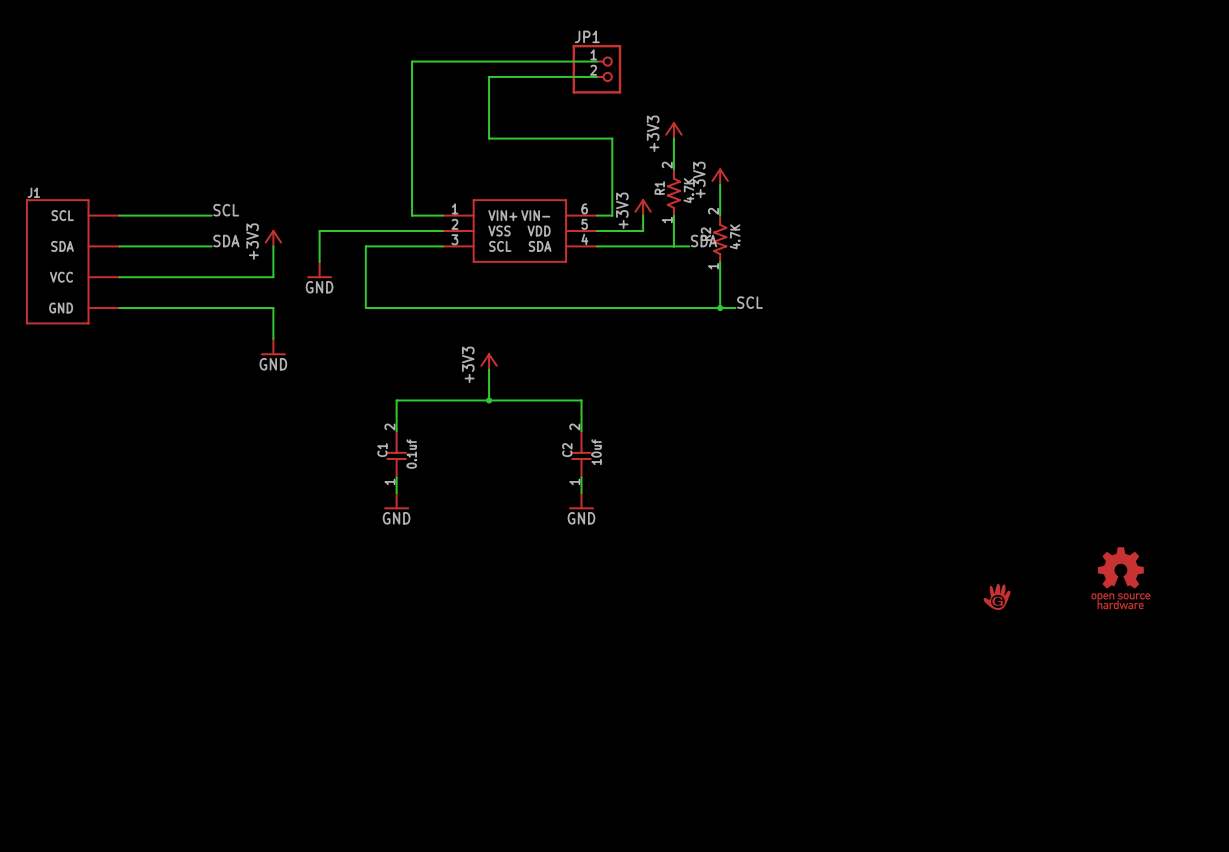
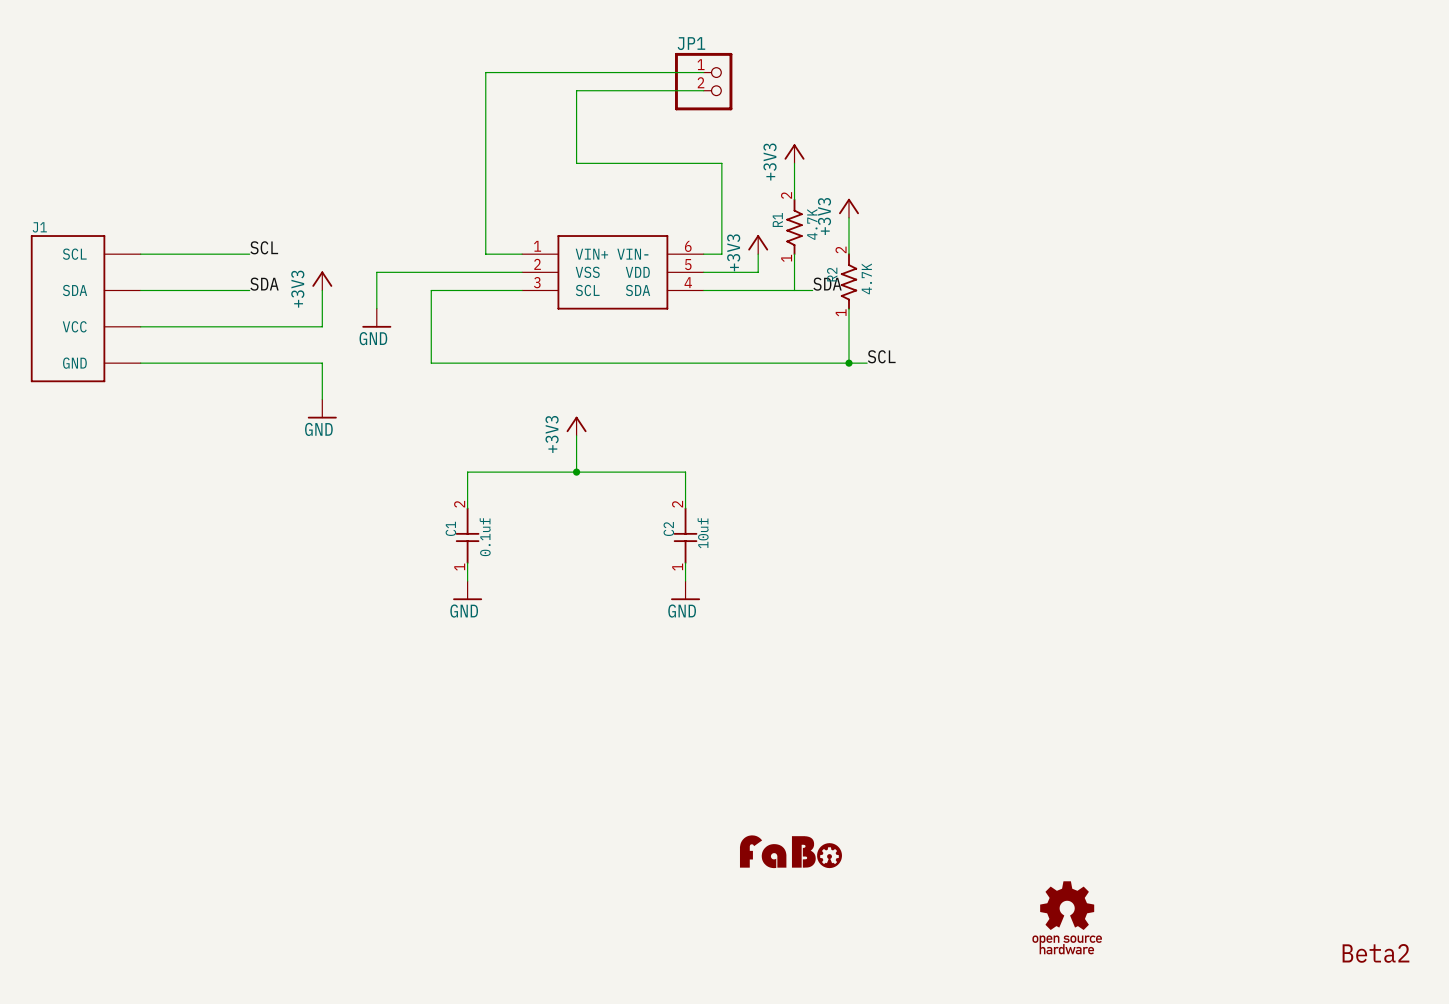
part: (1120, 578) -> none
part: (997, 596) -> none
part: none -> (790, 851)
part: none -> (1067, 917)
text: none -> Beta2 (1375, 953)

